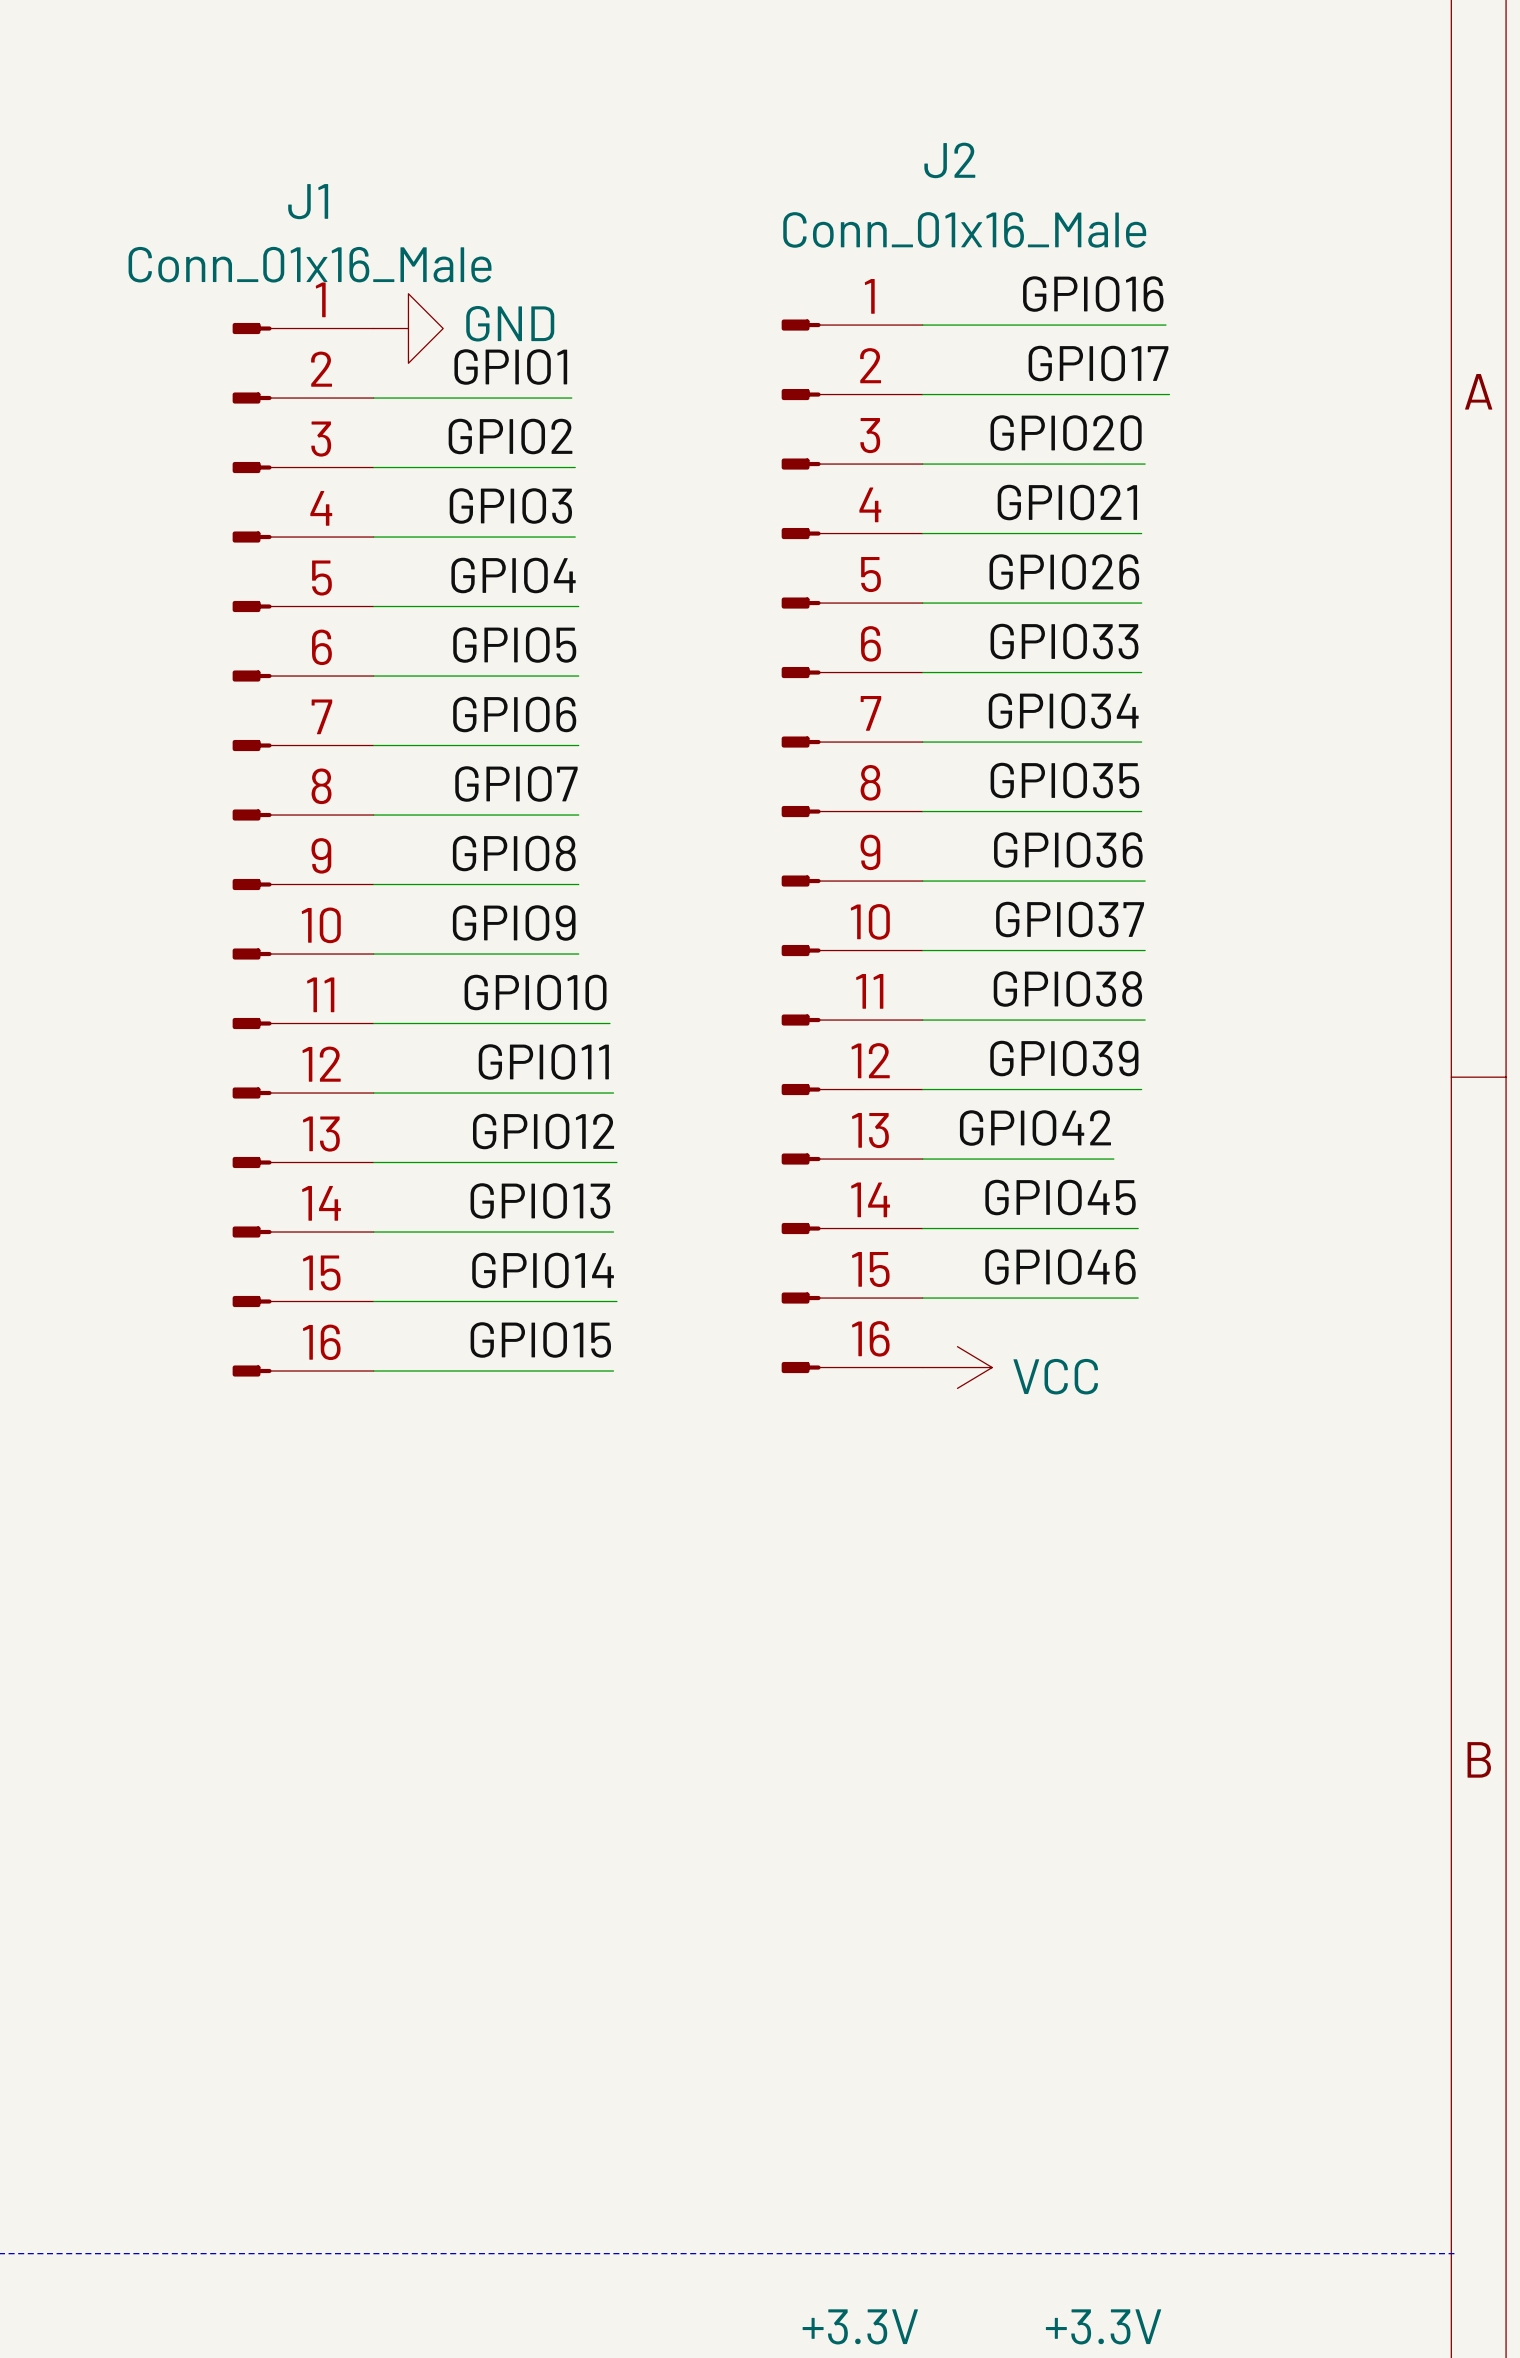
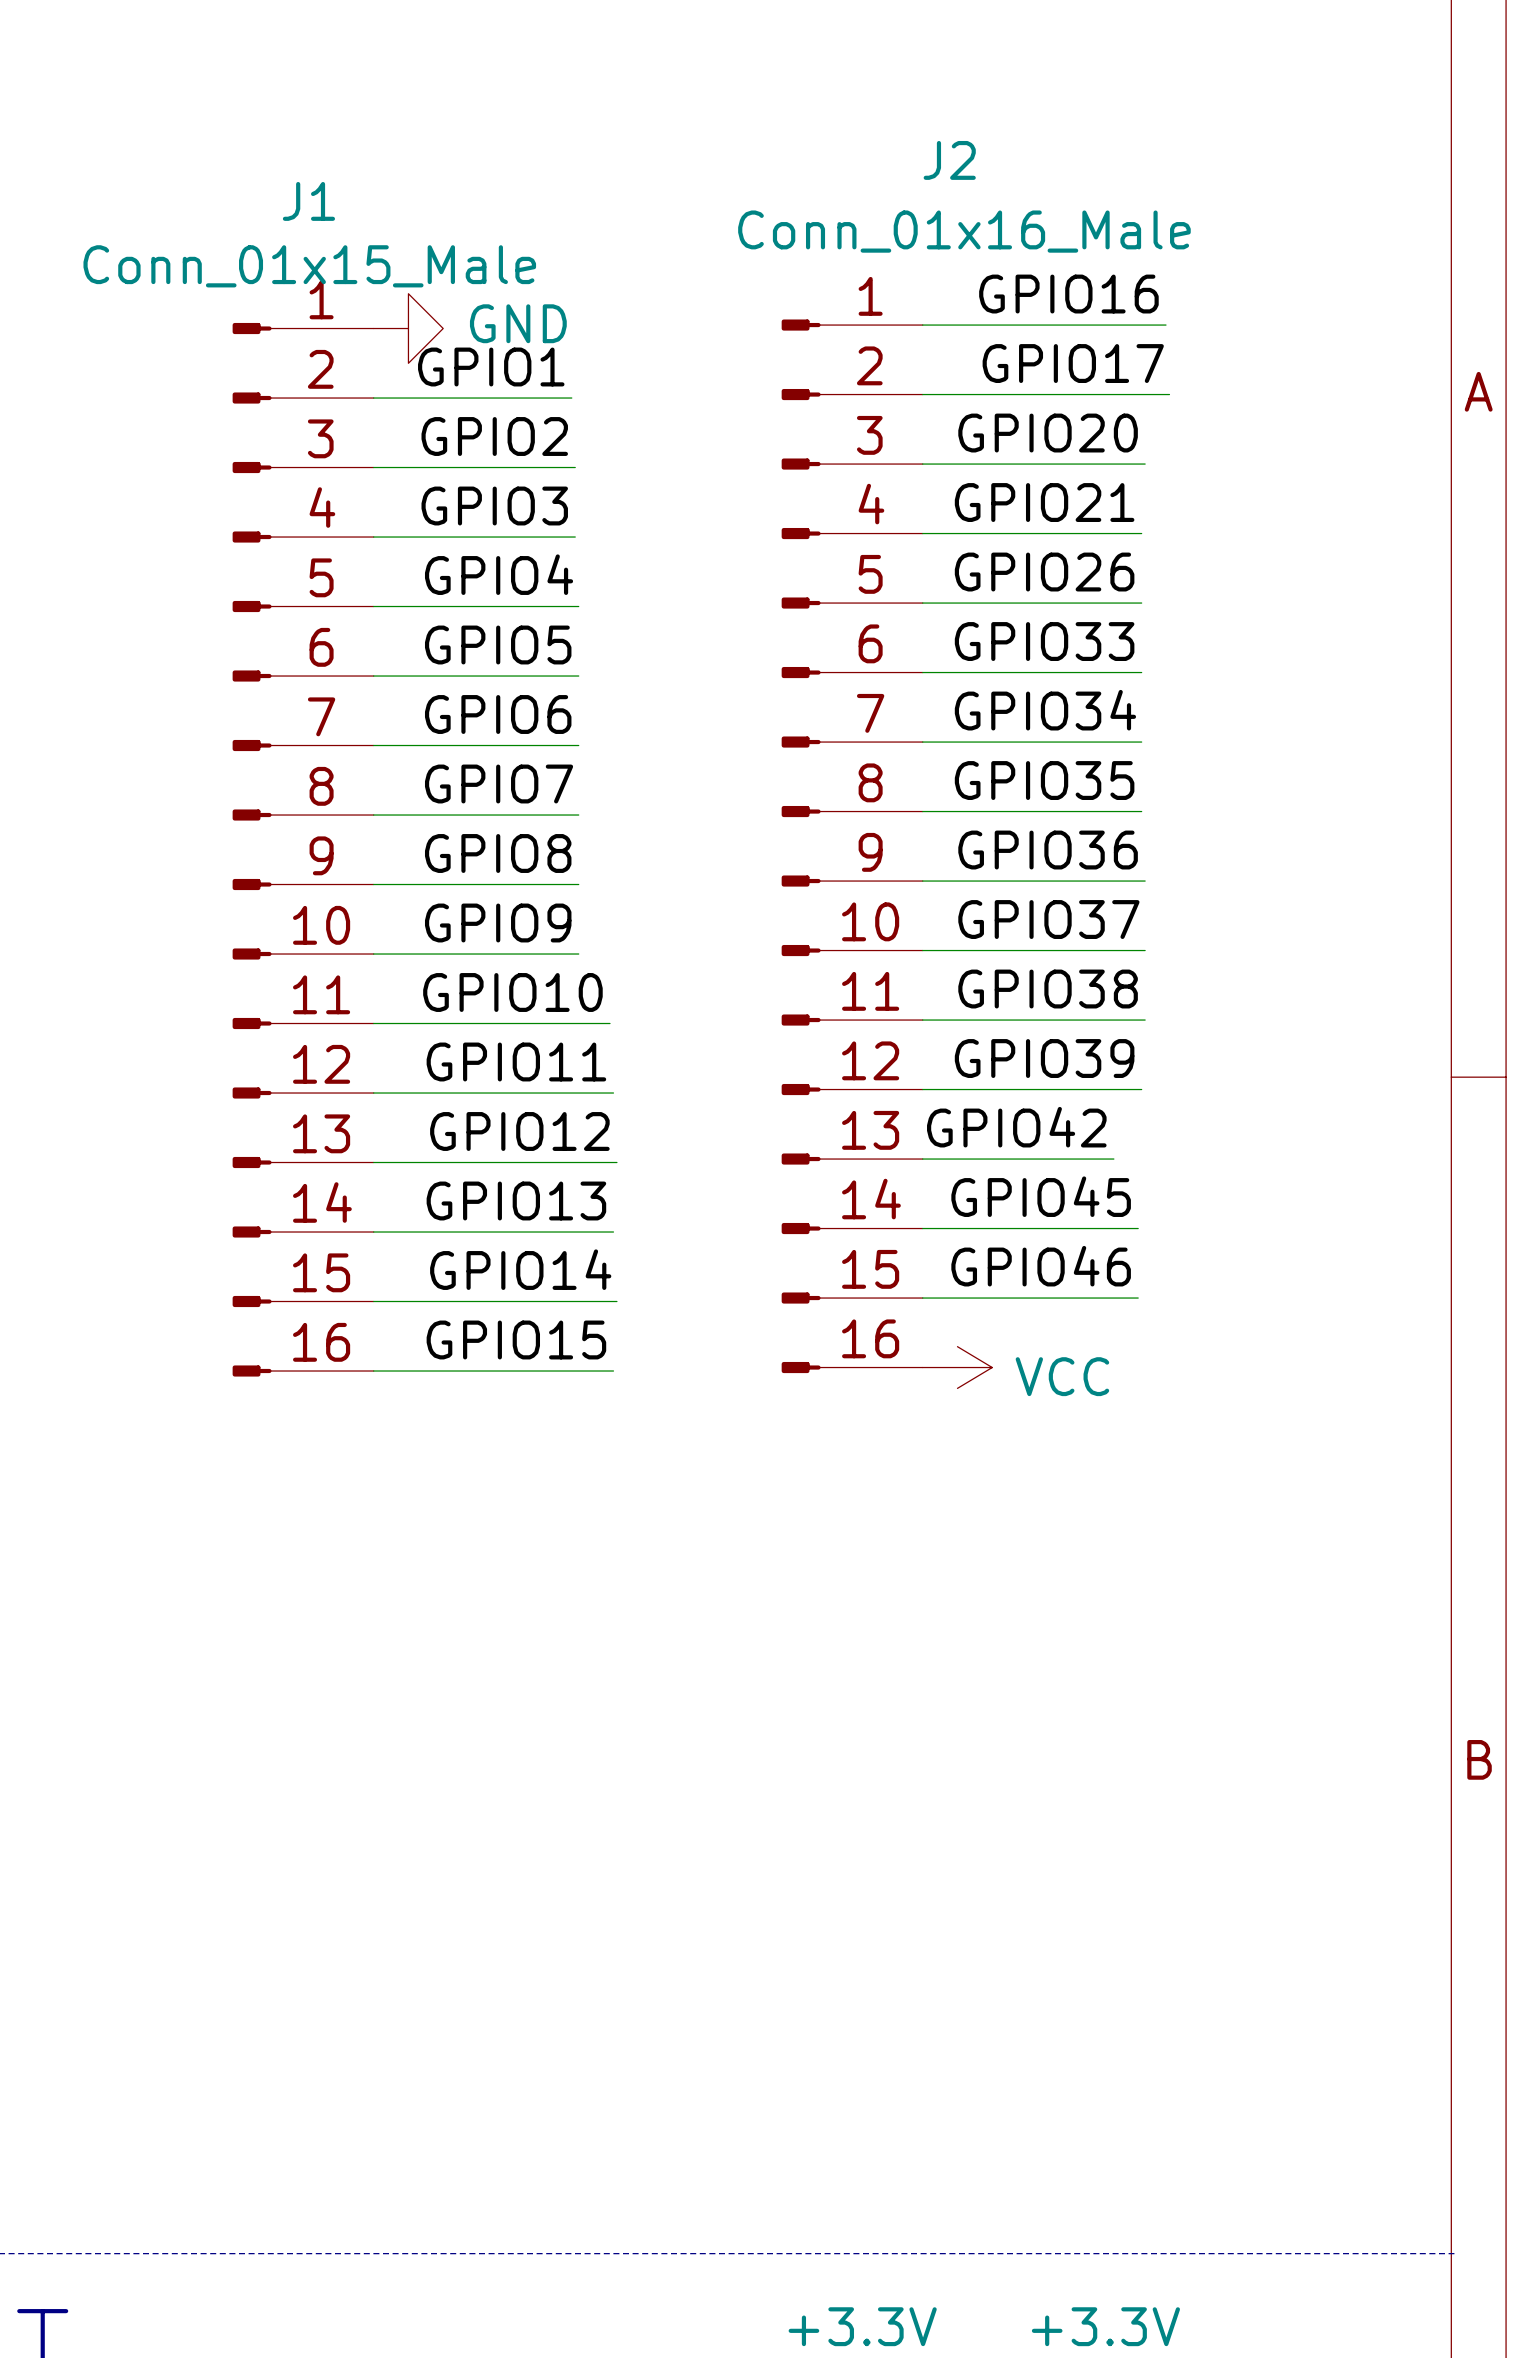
J1 value: Conn_01x16_Male (310, 264) -> Conn_01x15_Male (309, 266)

